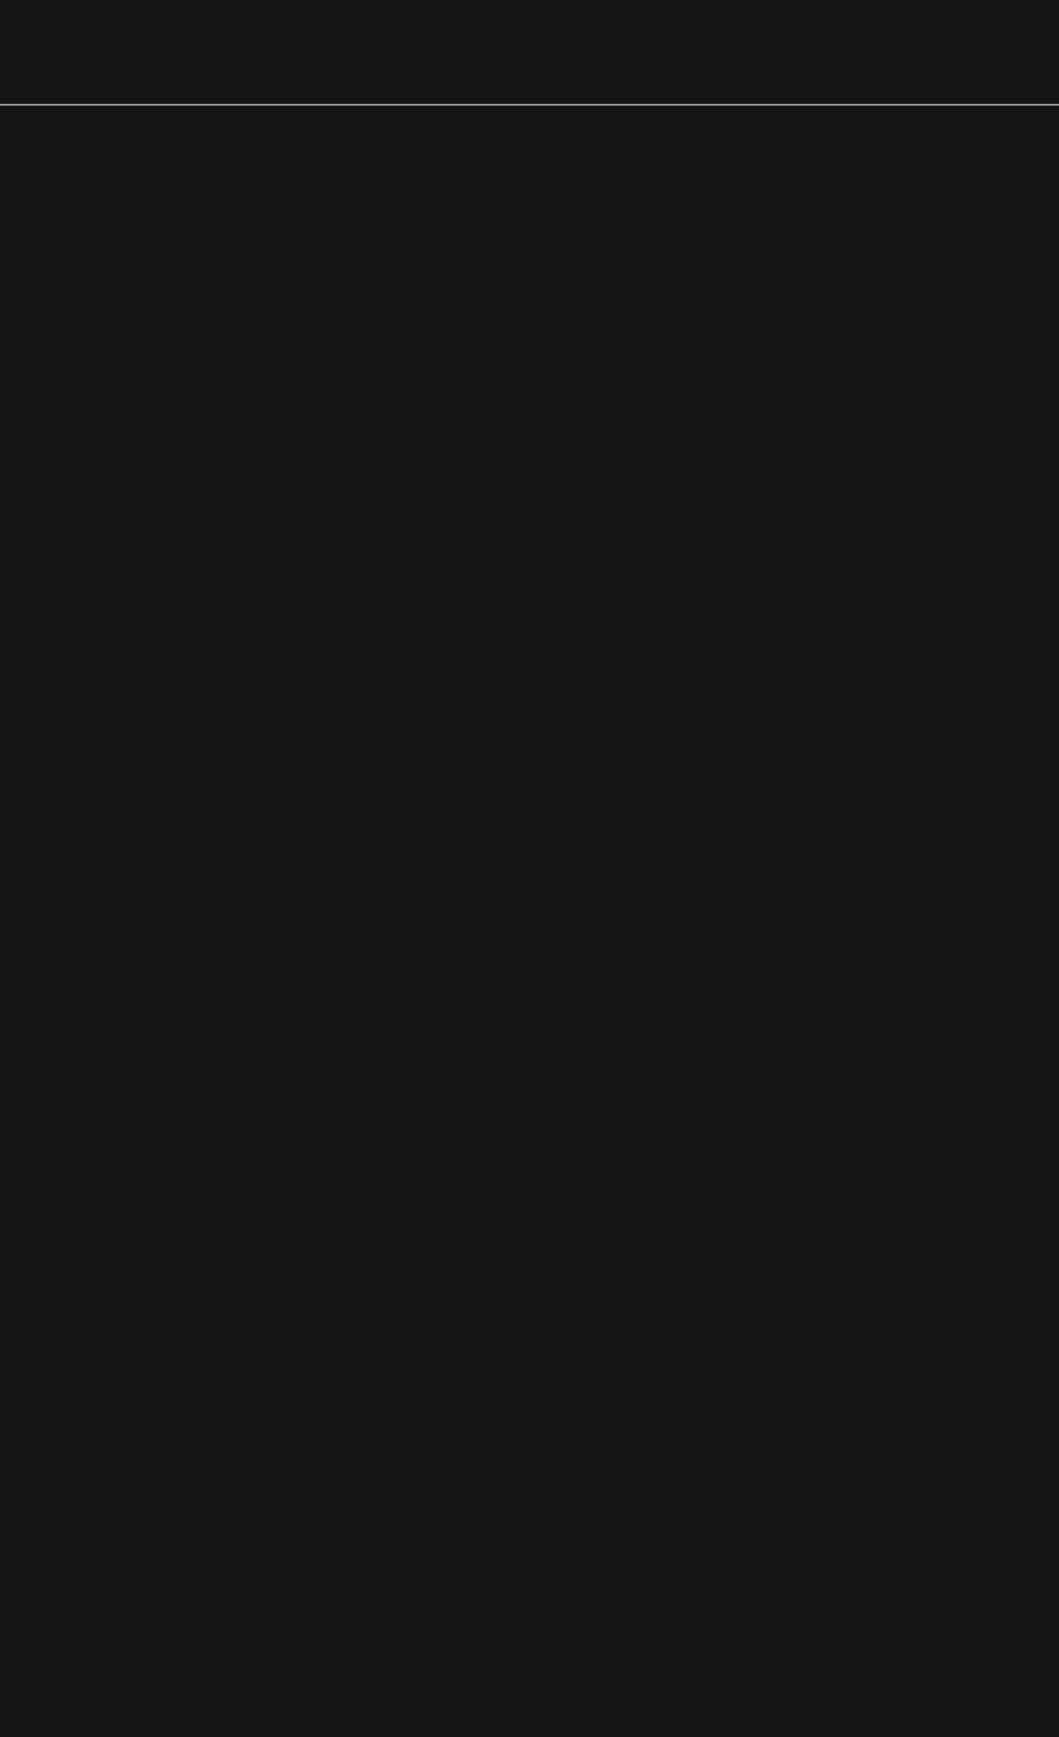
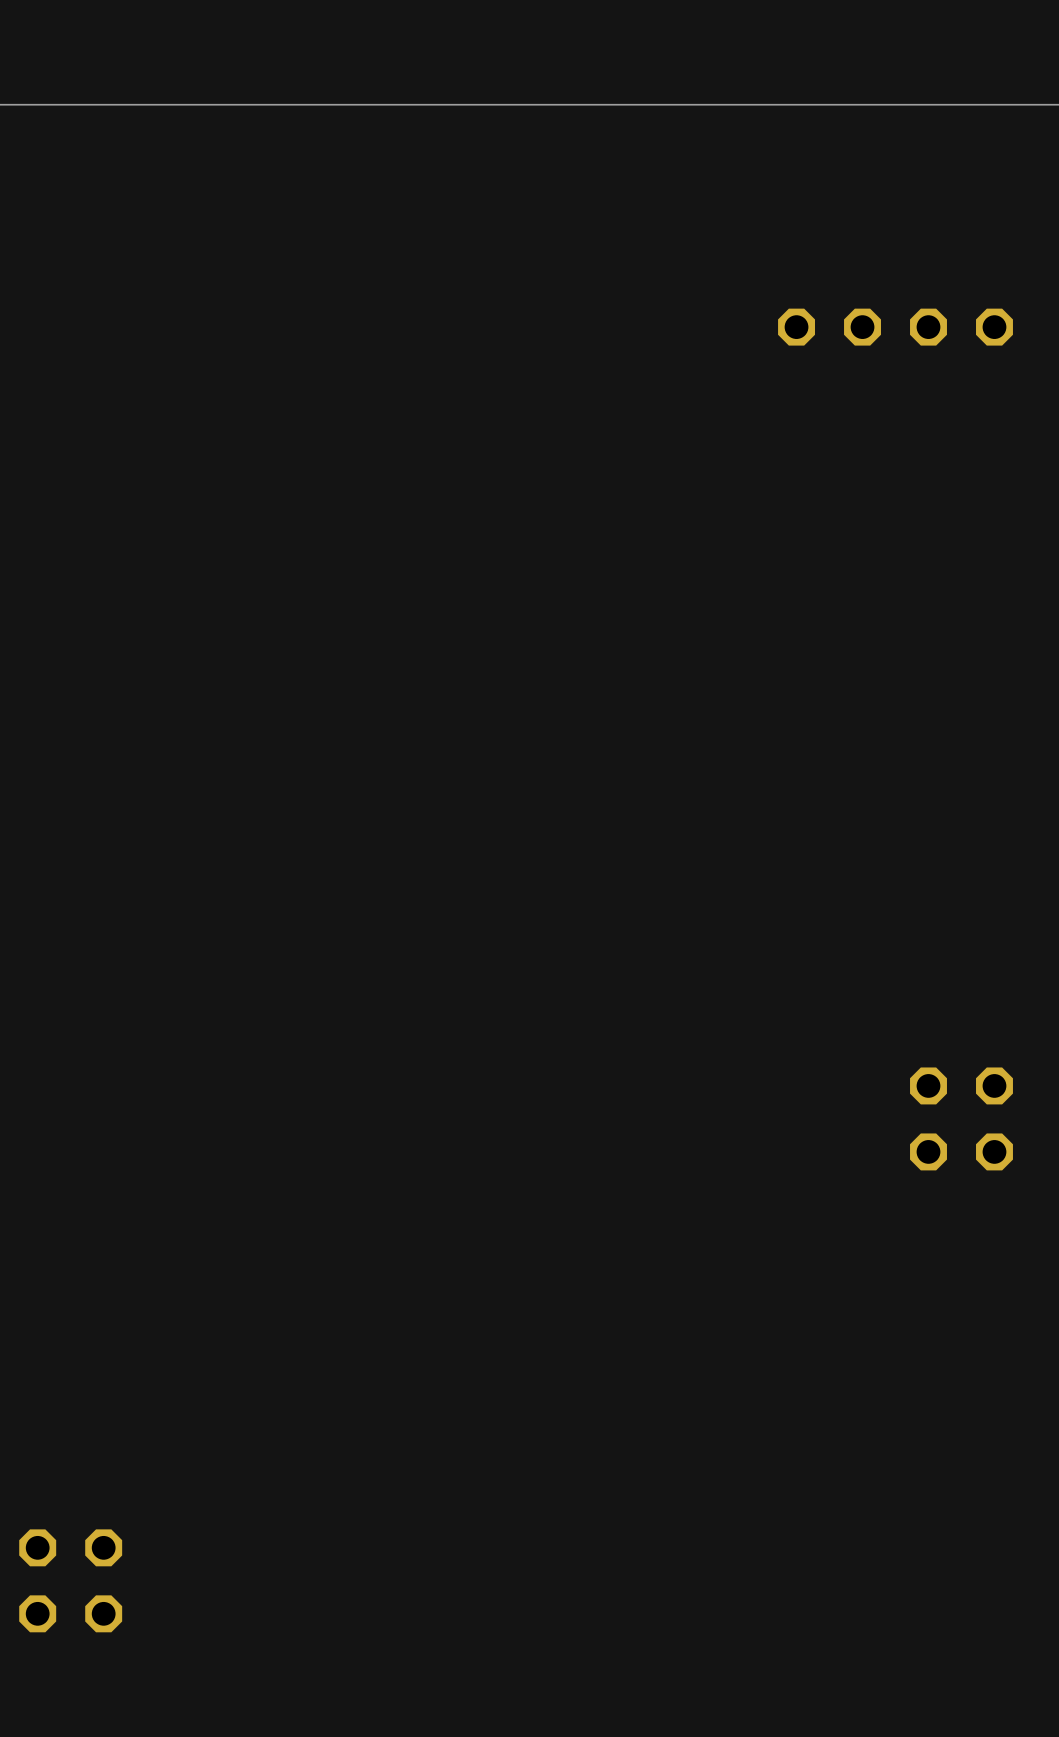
part: none -> (895, 327)
part: none -> (961, 1118)
part: none -> (70, 1580)

